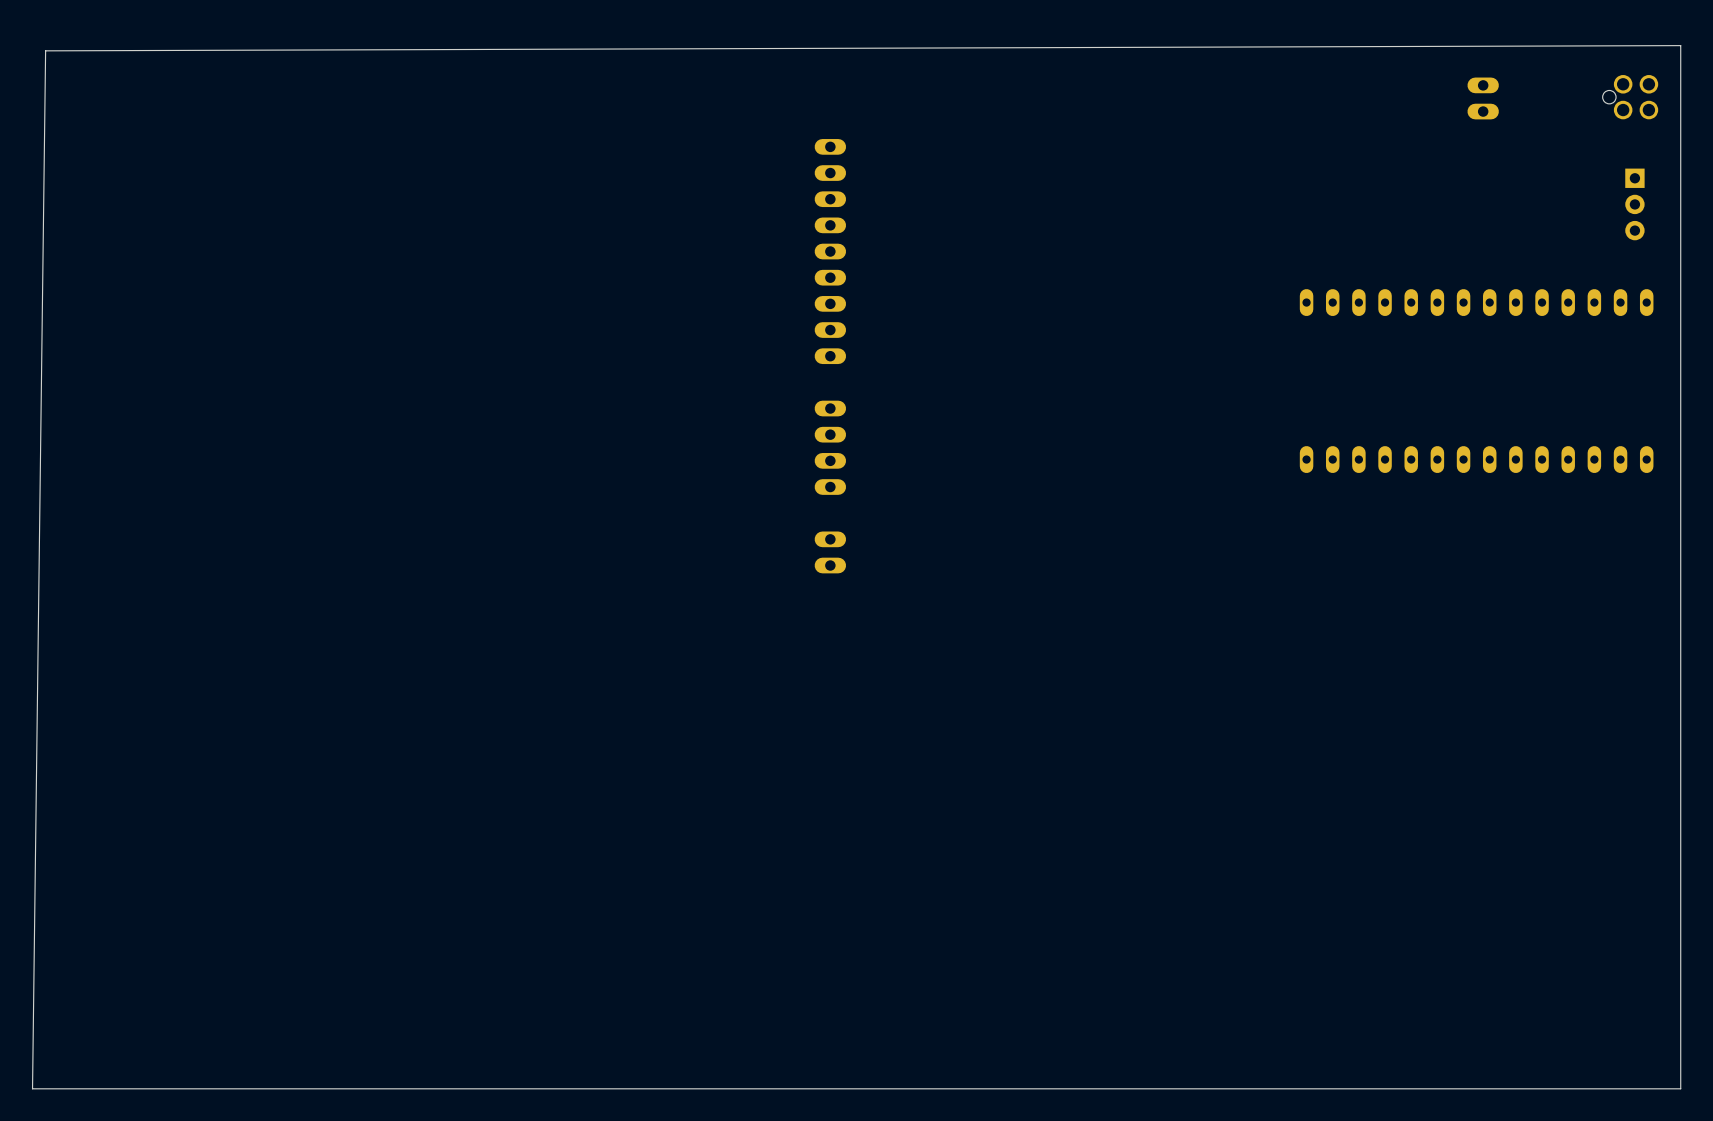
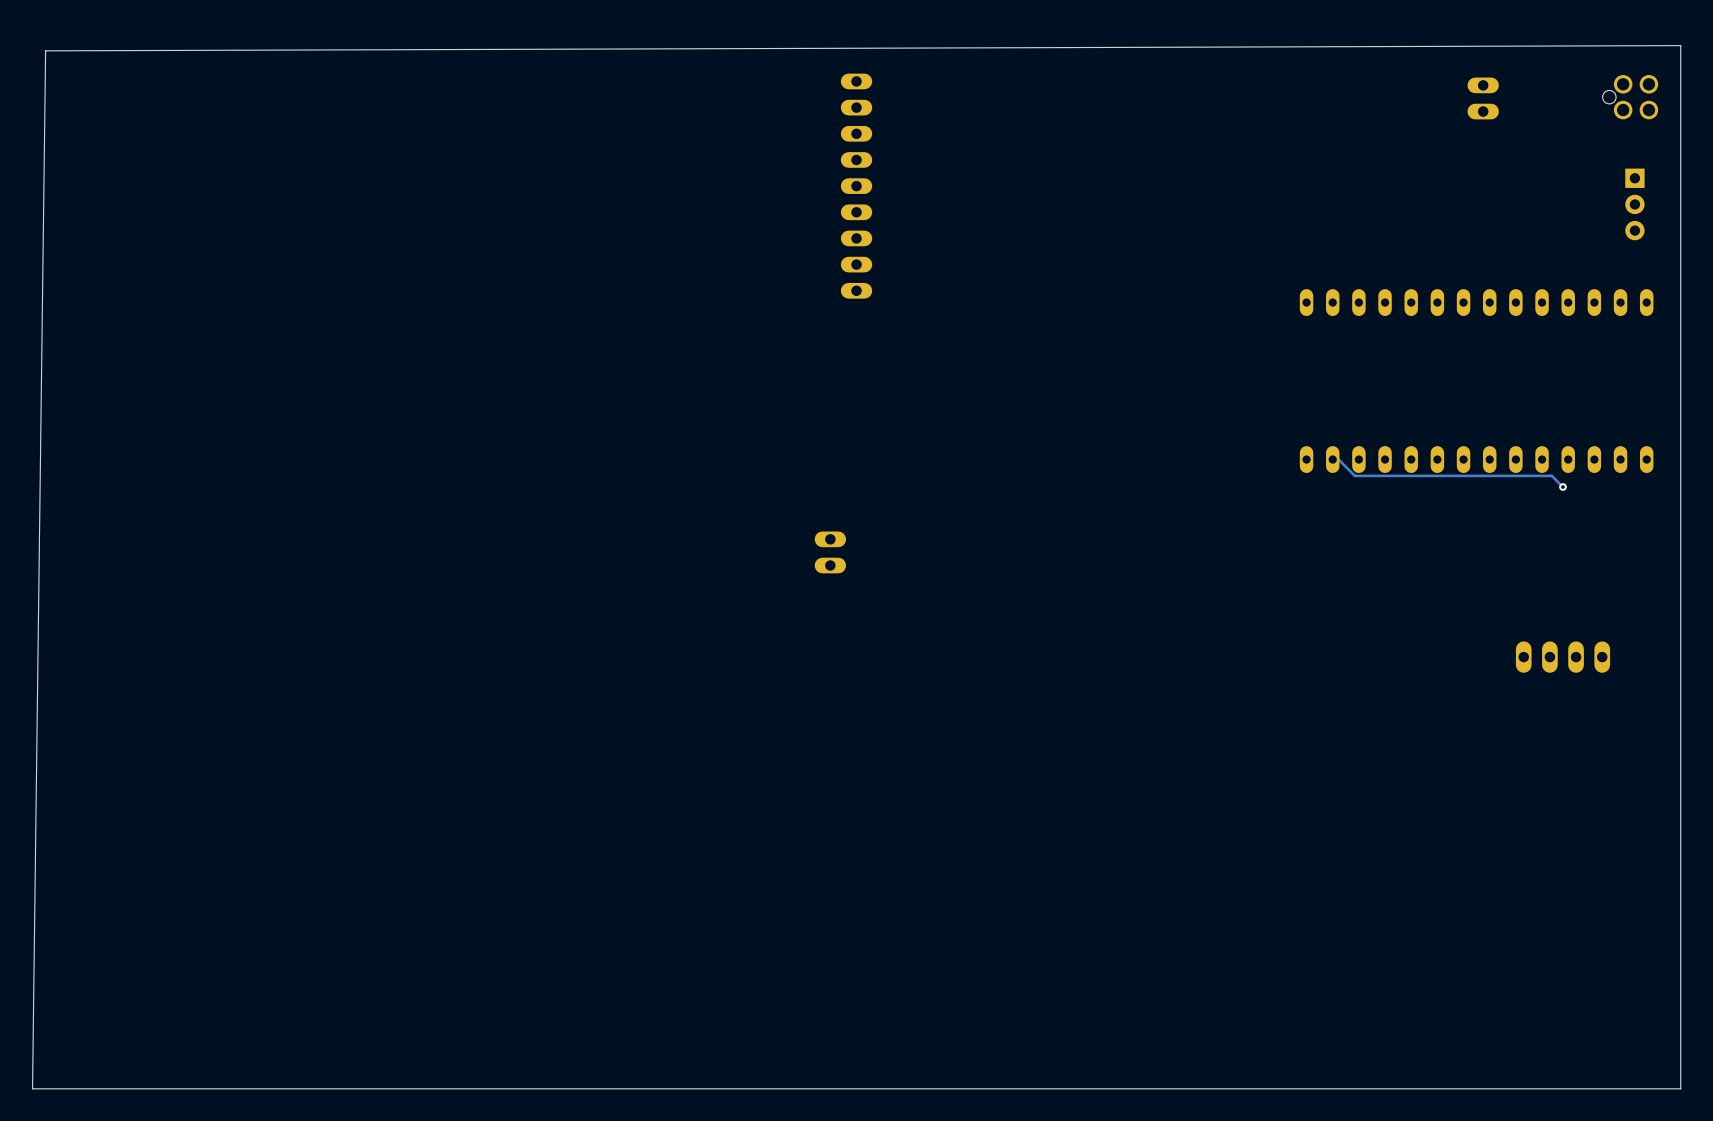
part position: (830, 251) -> (856, 186)
part: (830, 447) -> none
track: none -> (1332, 459) (1338, 459) (1354, 475) (1551, 475) (1562, 487)
via: none -> (1562, 487)
part: none -> (1562, 657)

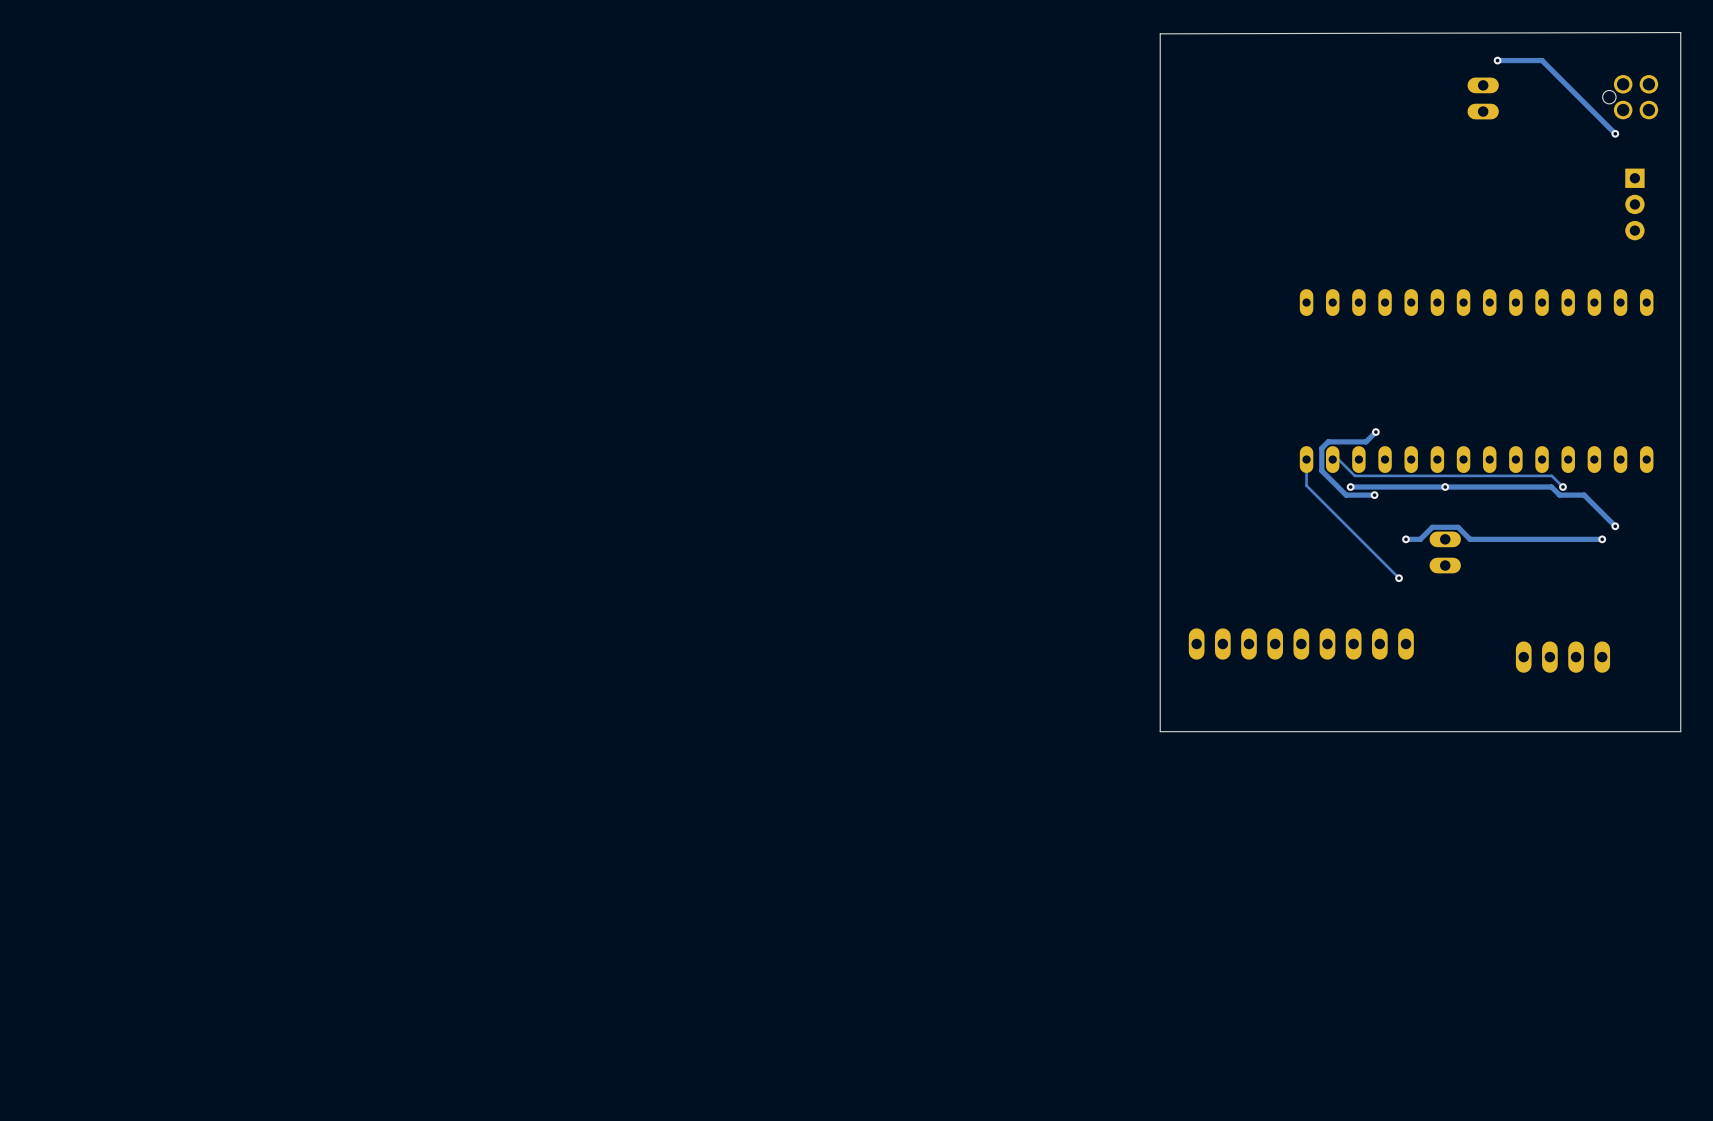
board edge: (1680, 45) (45, 50) (32, 1088) (1680, 1088) (1680, 731) -> (1680, 45) (1680, 32) (1160, 33) (1160, 731) (1680, 731)
track: none -> (1497, 60) (1542, 60) (1615, 133)
via: none -> (1497, 60)
via: none -> (1615, 133)
part: (856, 186) -> none
track: none -> (1375, 432) (1366, 441) (1328, 441) (1321, 448) (1321, 470) (1346, 495) (1374, 495)
via: none -> (1375, 432)
track: none -> (1306, 459) (1306, 485) (1399, 578)
track: none -> (1350, 487) (1551, 487) (1559, 495) (1584, 495) (1615, 526)
via: none -> (1350, 487)
via: none -> (1445, 487)
via: none -> (1374, 495)
via: none -> (1615, 526)
via: none -> (1405, 539)
track: none -> (1602, 539) (1470, 539) (1458, 527) (1432, 527) (1420, 539) (1405, 539)
via: none -> (1602, 539)
part: (830, 552) -> none
part: none -> (1445, 552)
via: none -> (1399, 578)
part: none -> (1301, 644)

